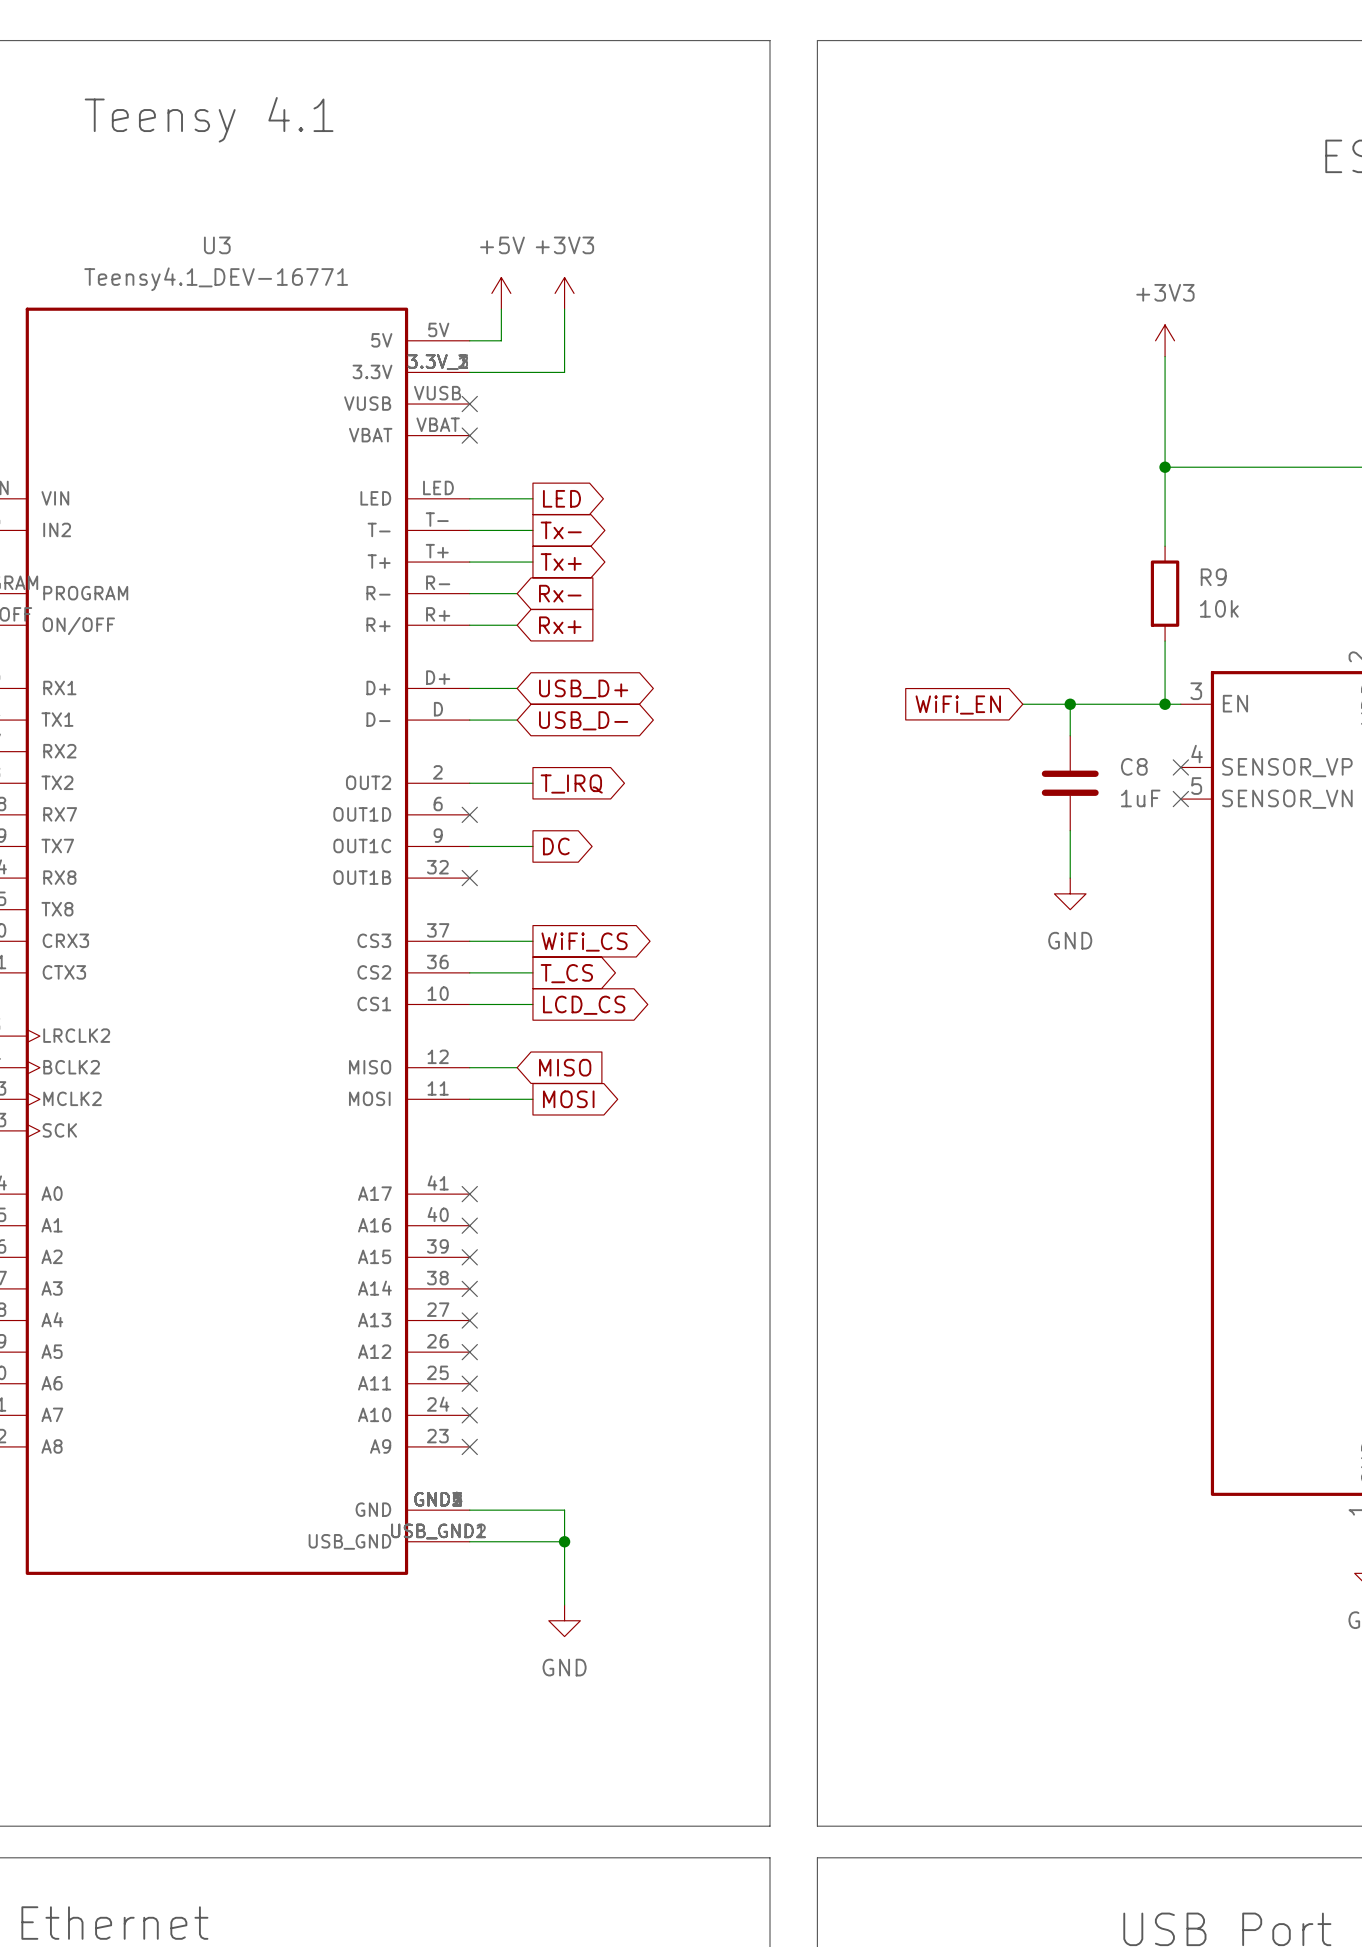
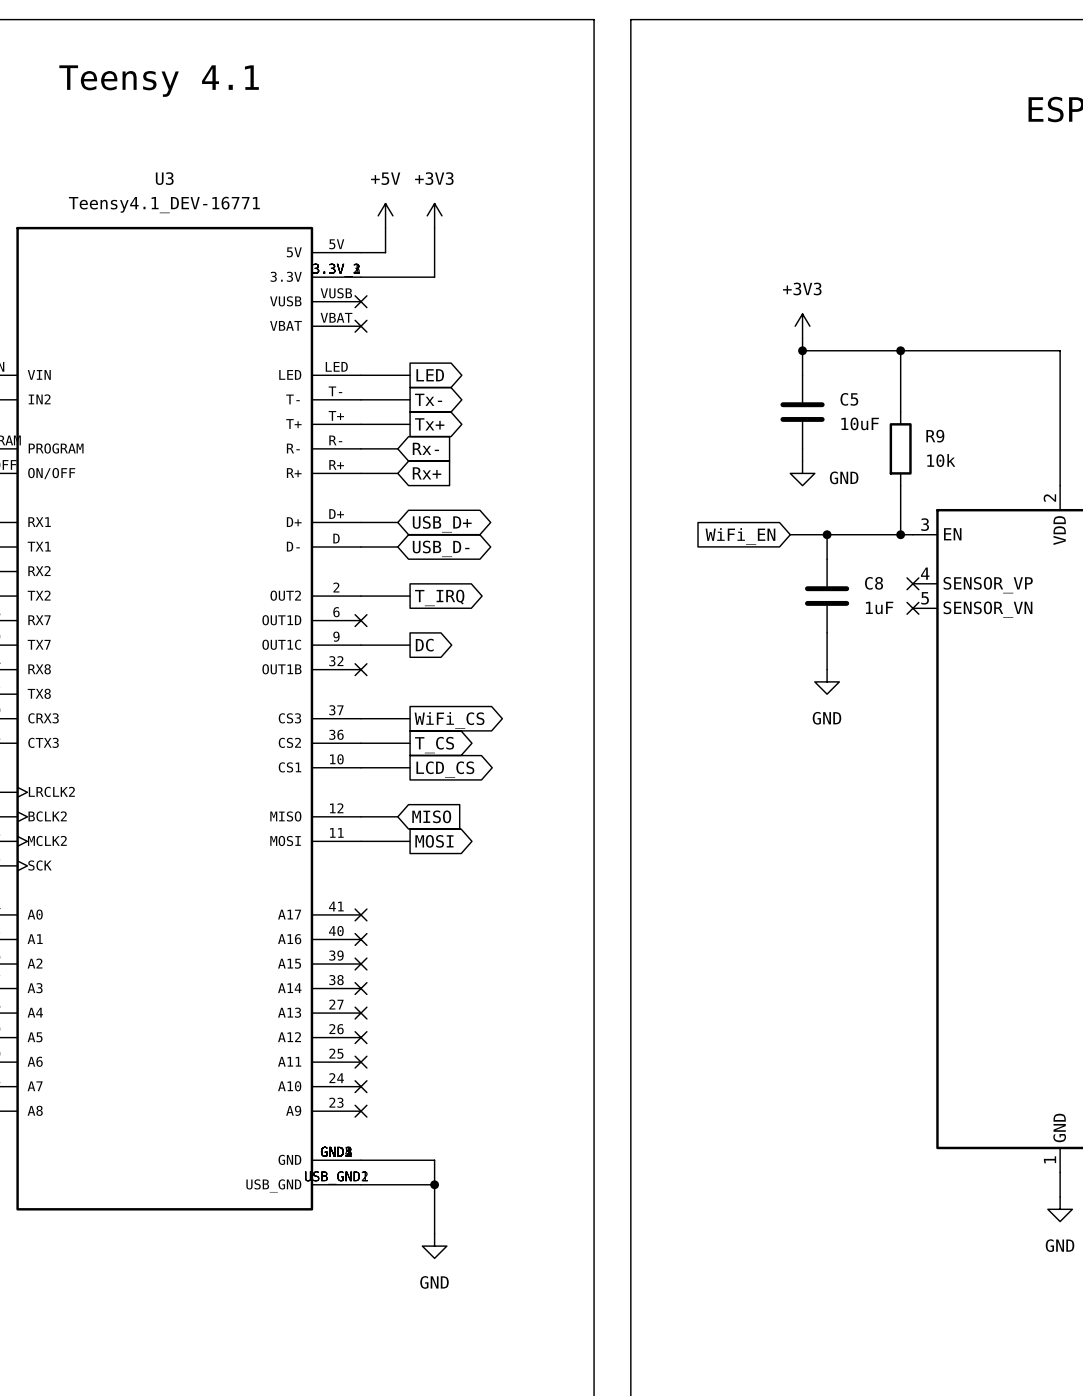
power symbol position: +3V3 (1165, 340) -> +3V3 (802, 326)
wire: (1165, 356) (1165, 467) -> (802, 350) (900, 350)
wire: none -> (802, 338) (802, 375)
junction: none -> (802, 350)
C5: none -> 10uF (802, 412)
wire: none -> (802, 448) (802, 461)
power symbol: none -> GND (802, 473)

